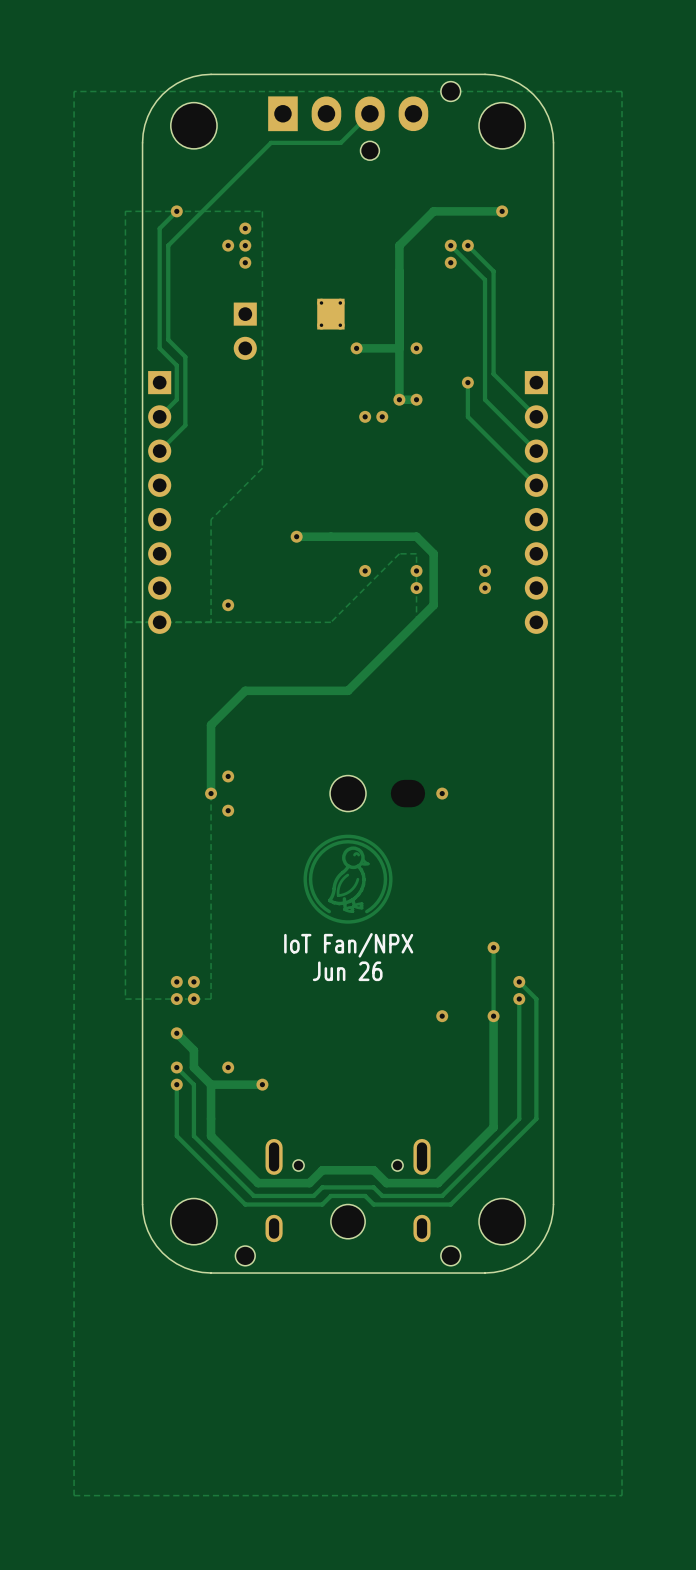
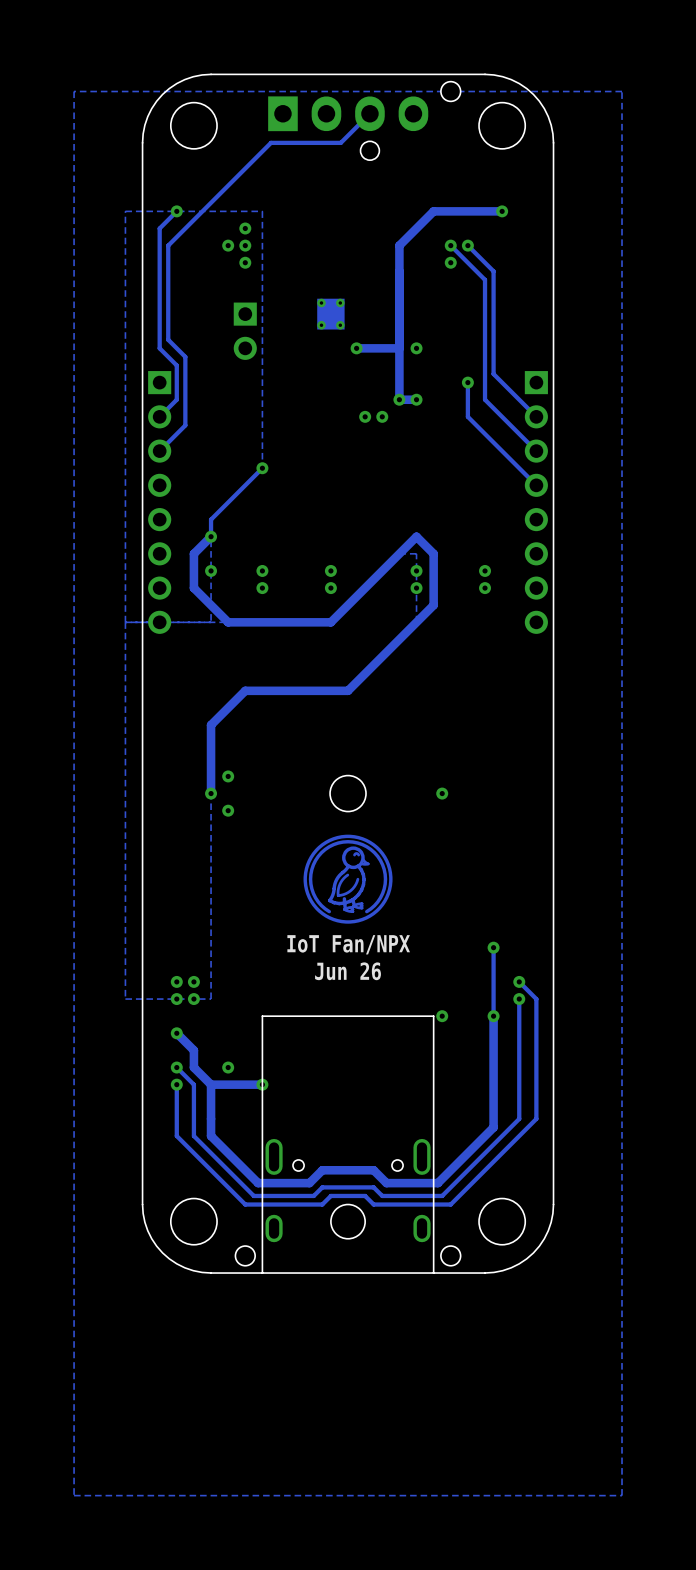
via: none -> (262, 468)
via: none -> (211, 536)
via: (296, 536) -> none
track: (416, 536) (296, 536) -> (416, 536) (330, 622) (228, 622) (193, 588) (193, 553) (211, 536) (211, 519) (262, 468)
via: none -> (211, 570)
via: none -> (262, 570)
via: none -> (330, 570)
via: (365, 570) -> none
via: none -> (262, 588)
via: none -> (330, 588)
via: (228, 605) -> none
board edge: none -> (433, 1273) (433, 1016) (262, 1016) (262, 1273)

